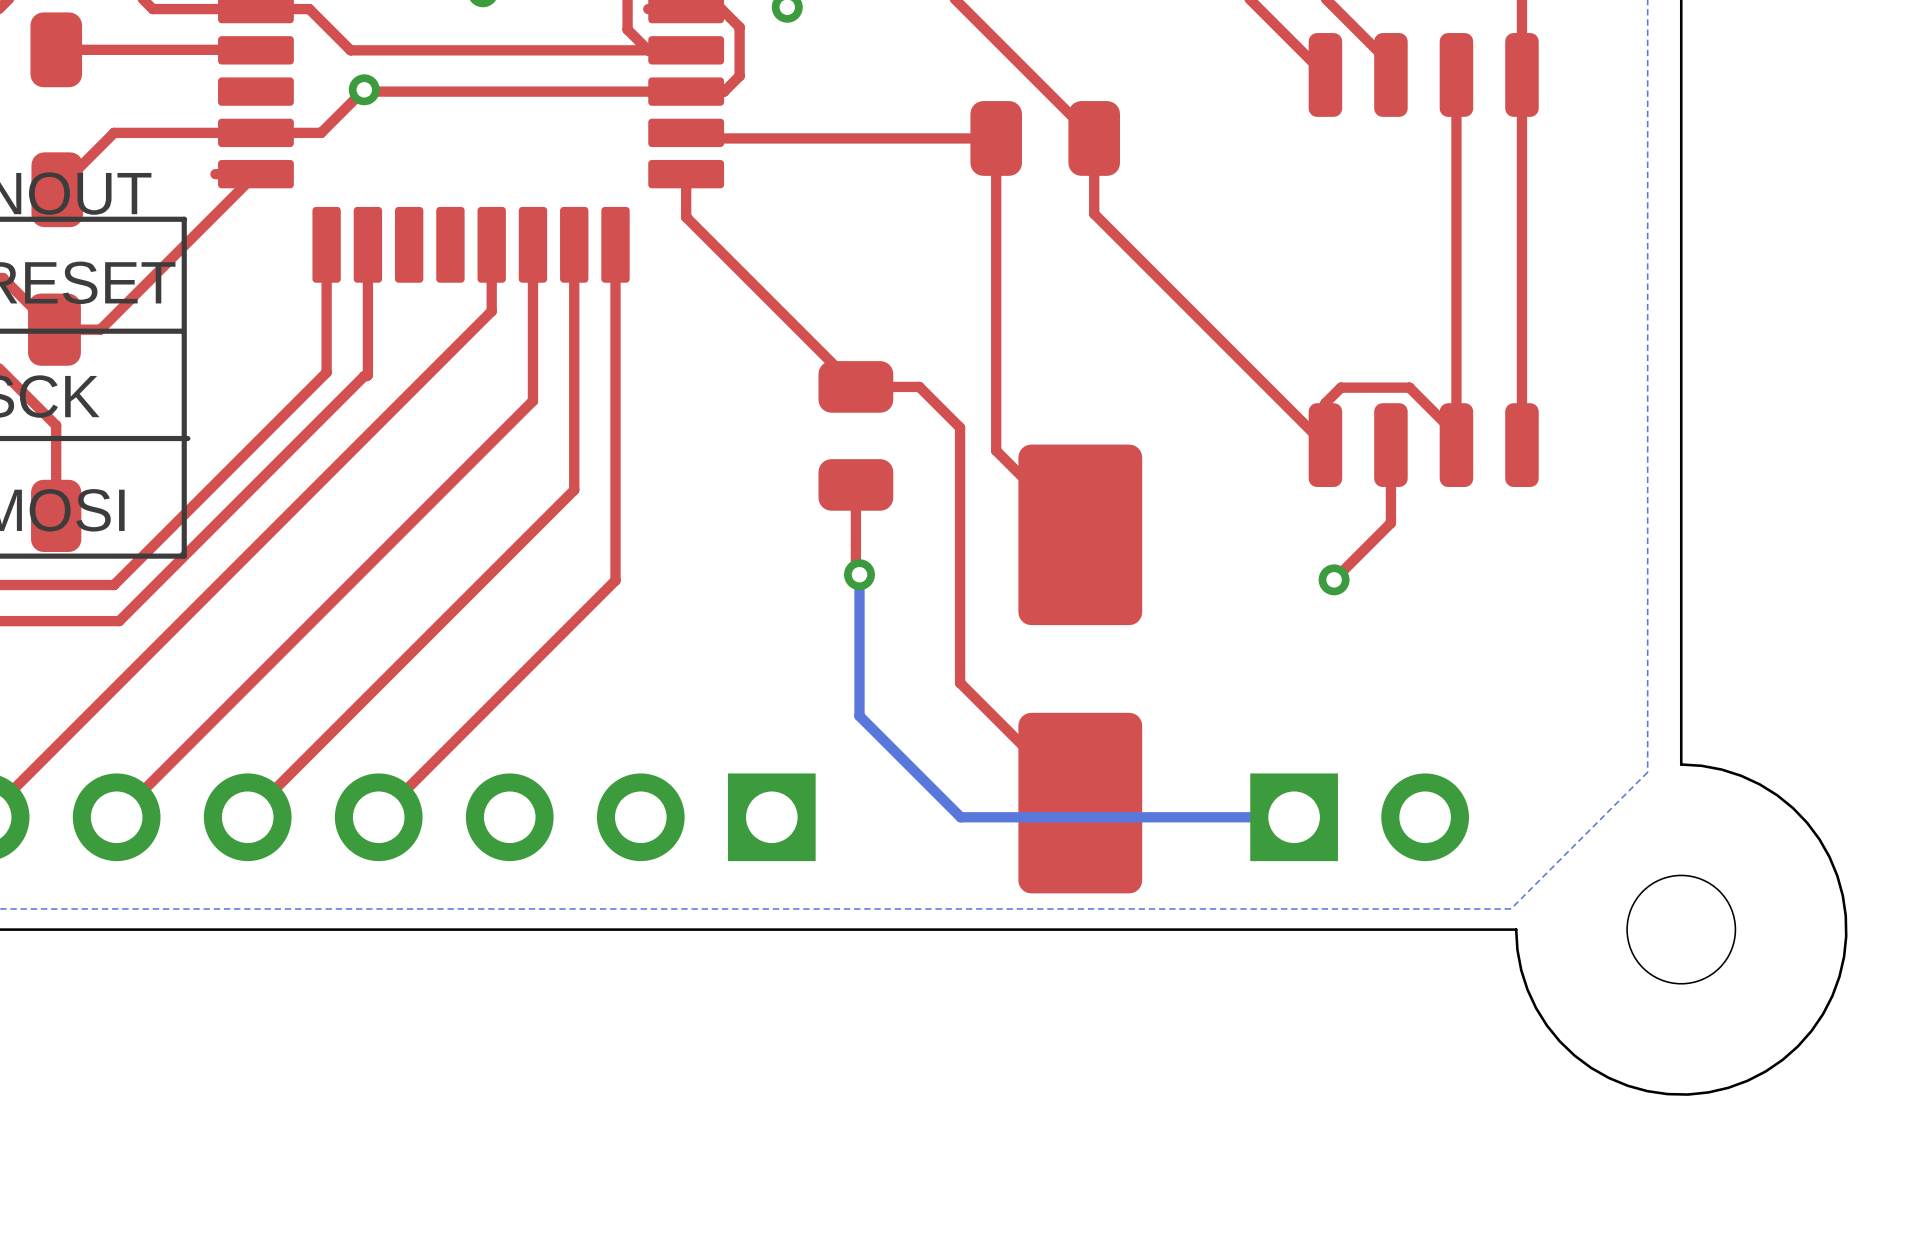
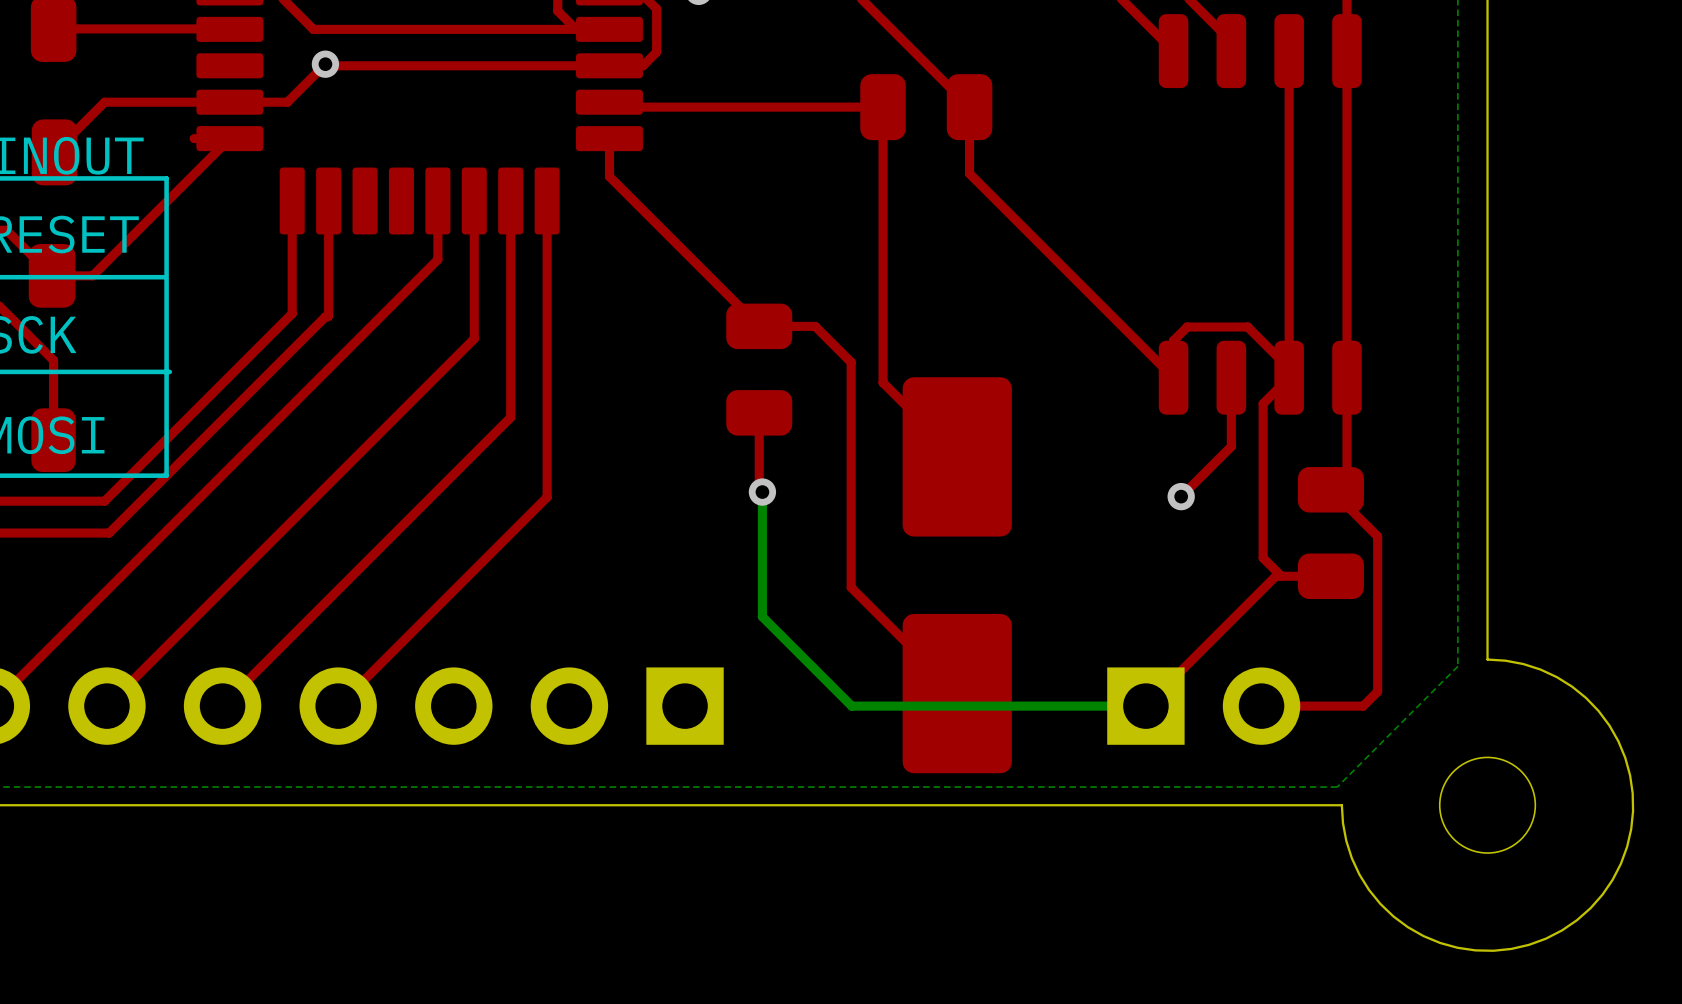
top track: none -> (1289, 377) (1263, 403) (1263, 558) (1281, 576)
top track: none -> (1346, 377) (1346, 473) (1330, 489) (1377, 536) (1377, 691) (1363, 706) (1261, 706)
part: none -> (1330, 533)
top track: none -> (1330, 576) (1275, 576) (1145, 706)

